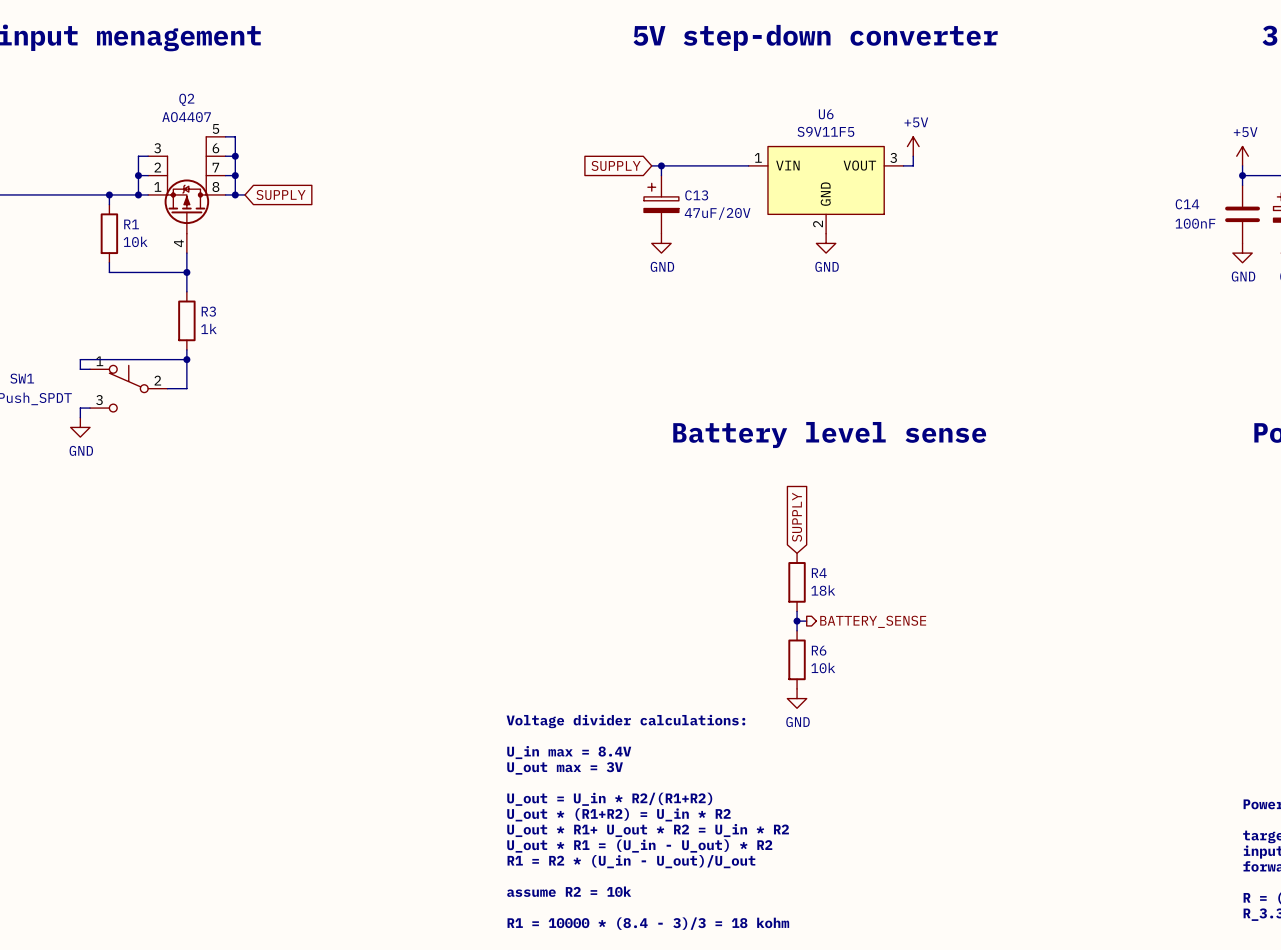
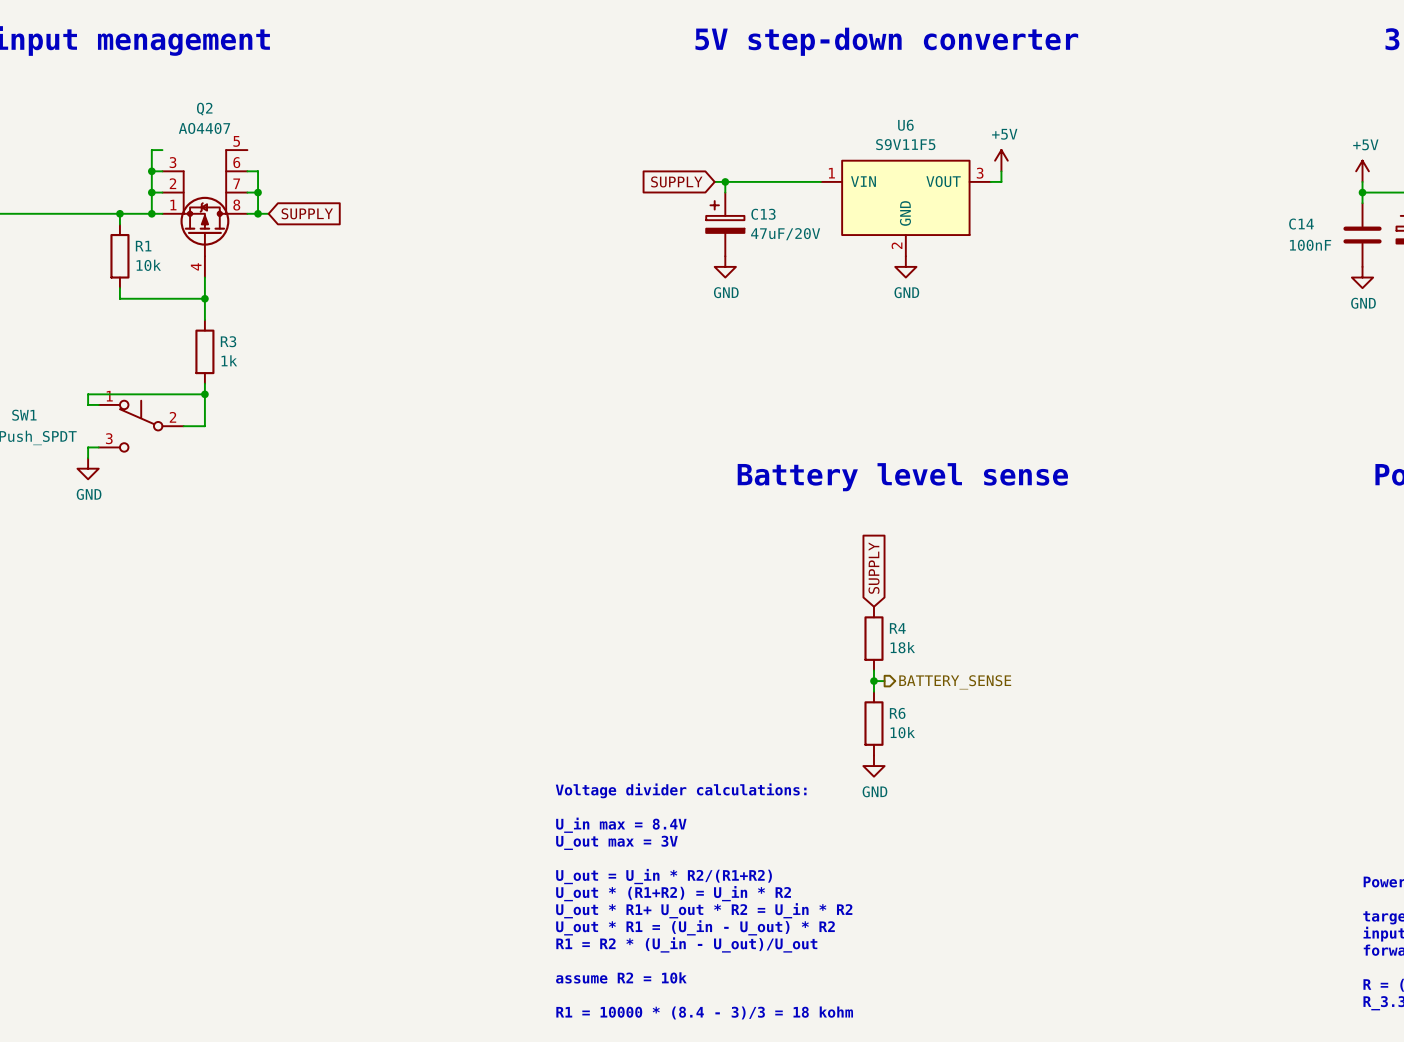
wire: none -> (162, 150) (151, 150) (151, 171)
wire: (225, 136) (235, 136) (235, 156) -> none
junction: none -> (151, 171)
junction: (235, 156) -> none

